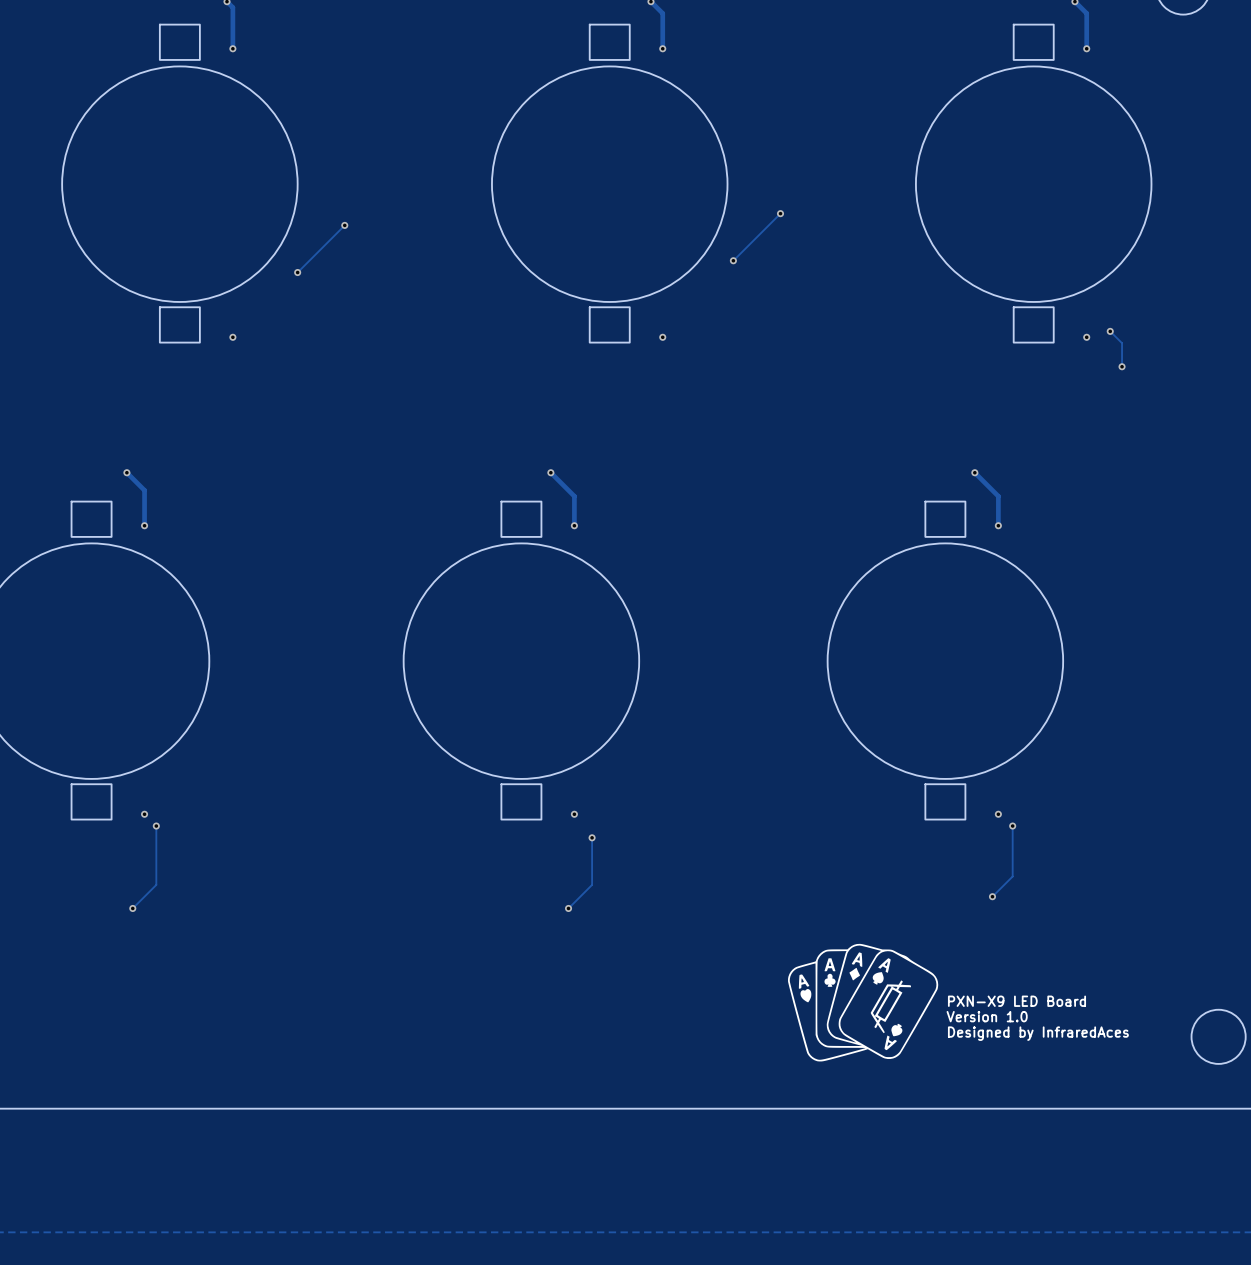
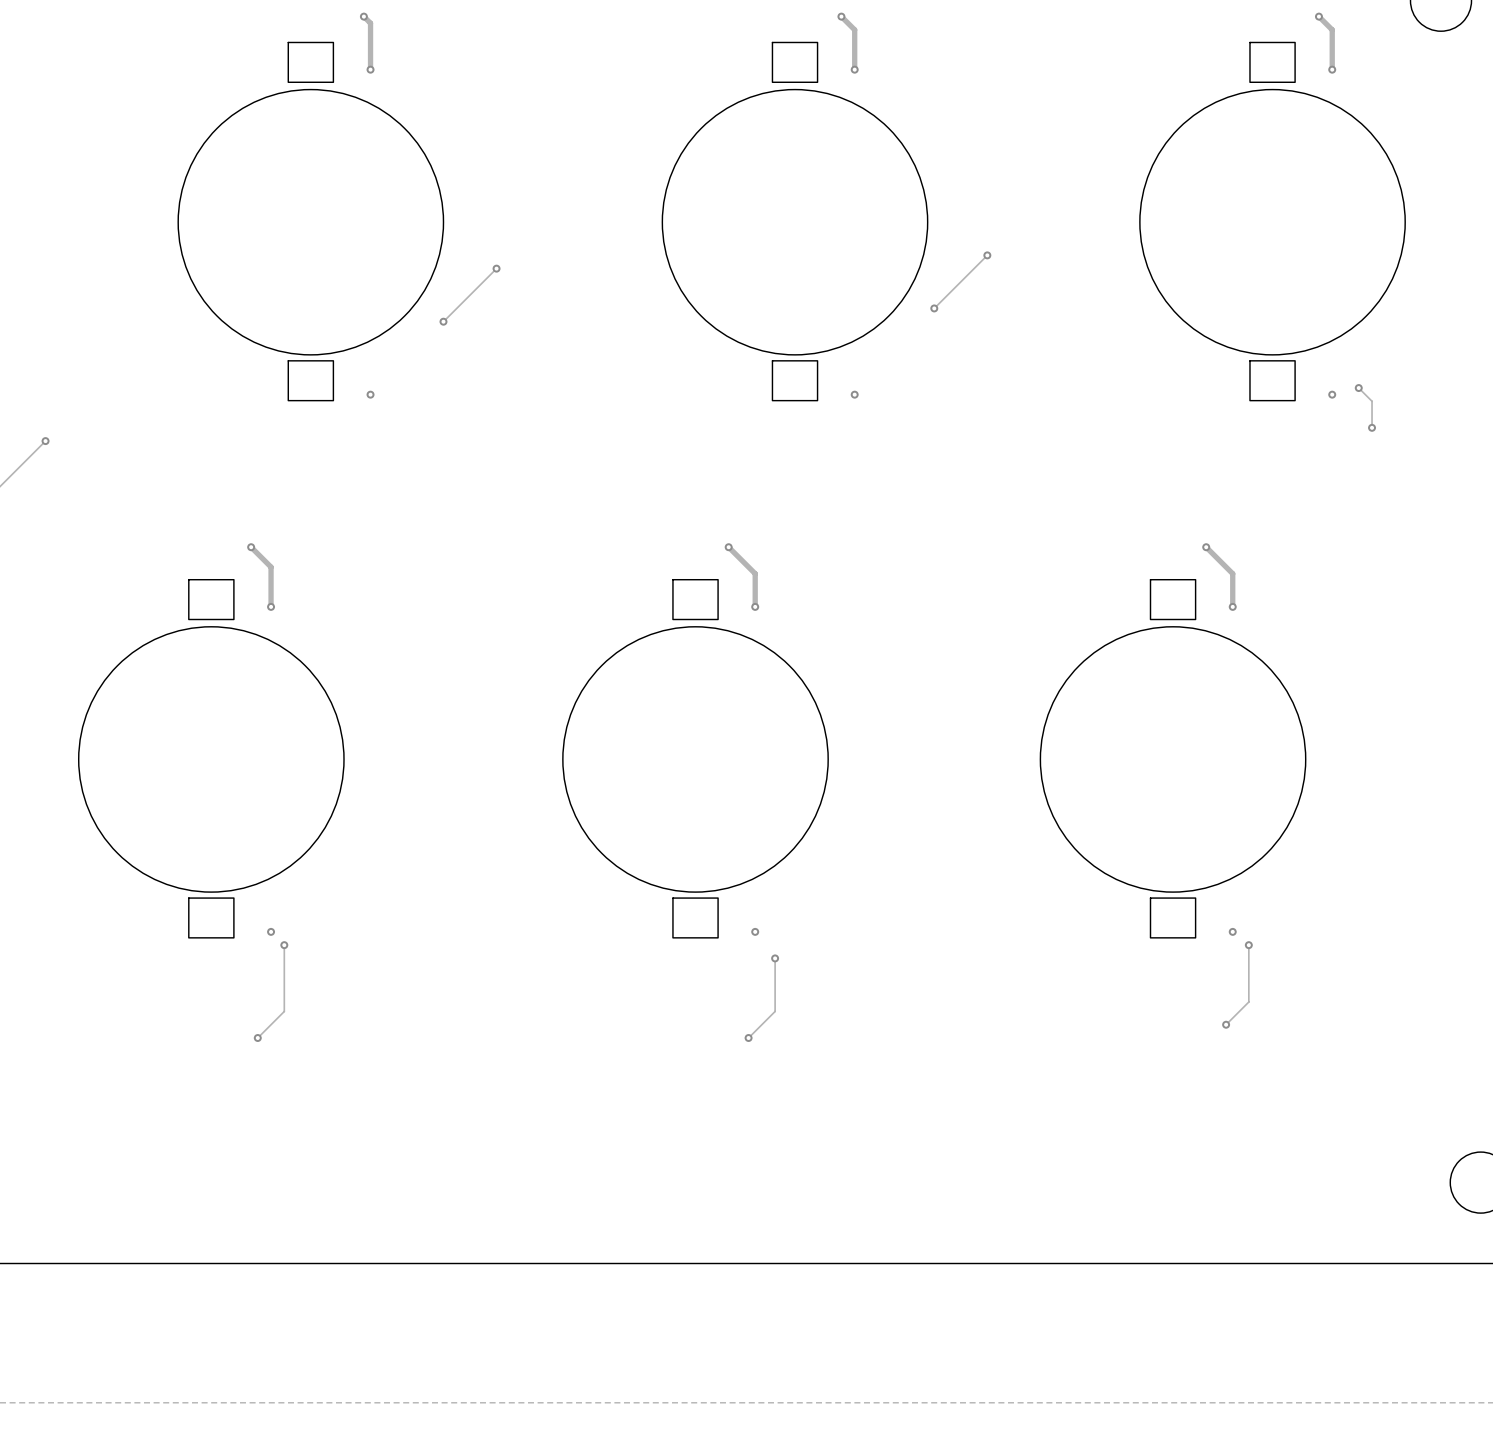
drawing: [788, 943, 939, 1062] -> none
text: PXN-X9 LED Board (1016, 1001) -> none
text: Version 1.0 (987, 1016) -> none
text: Designed by InfraredAces (1038, 1033) -> none

